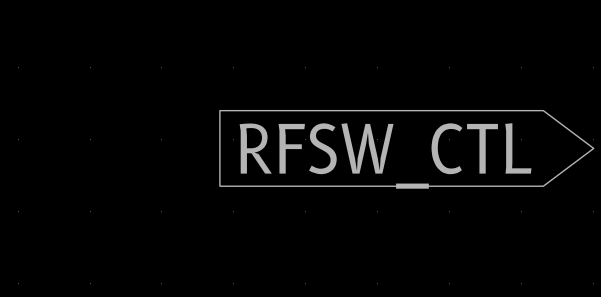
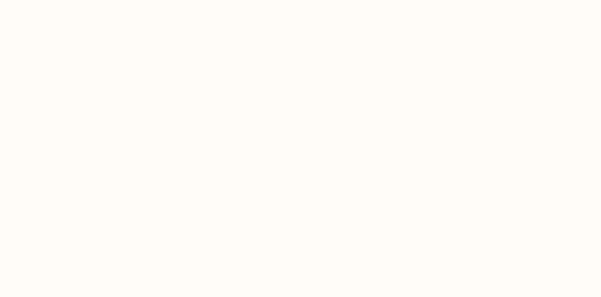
global label: RFSW_CTL (385, 155) -> none

